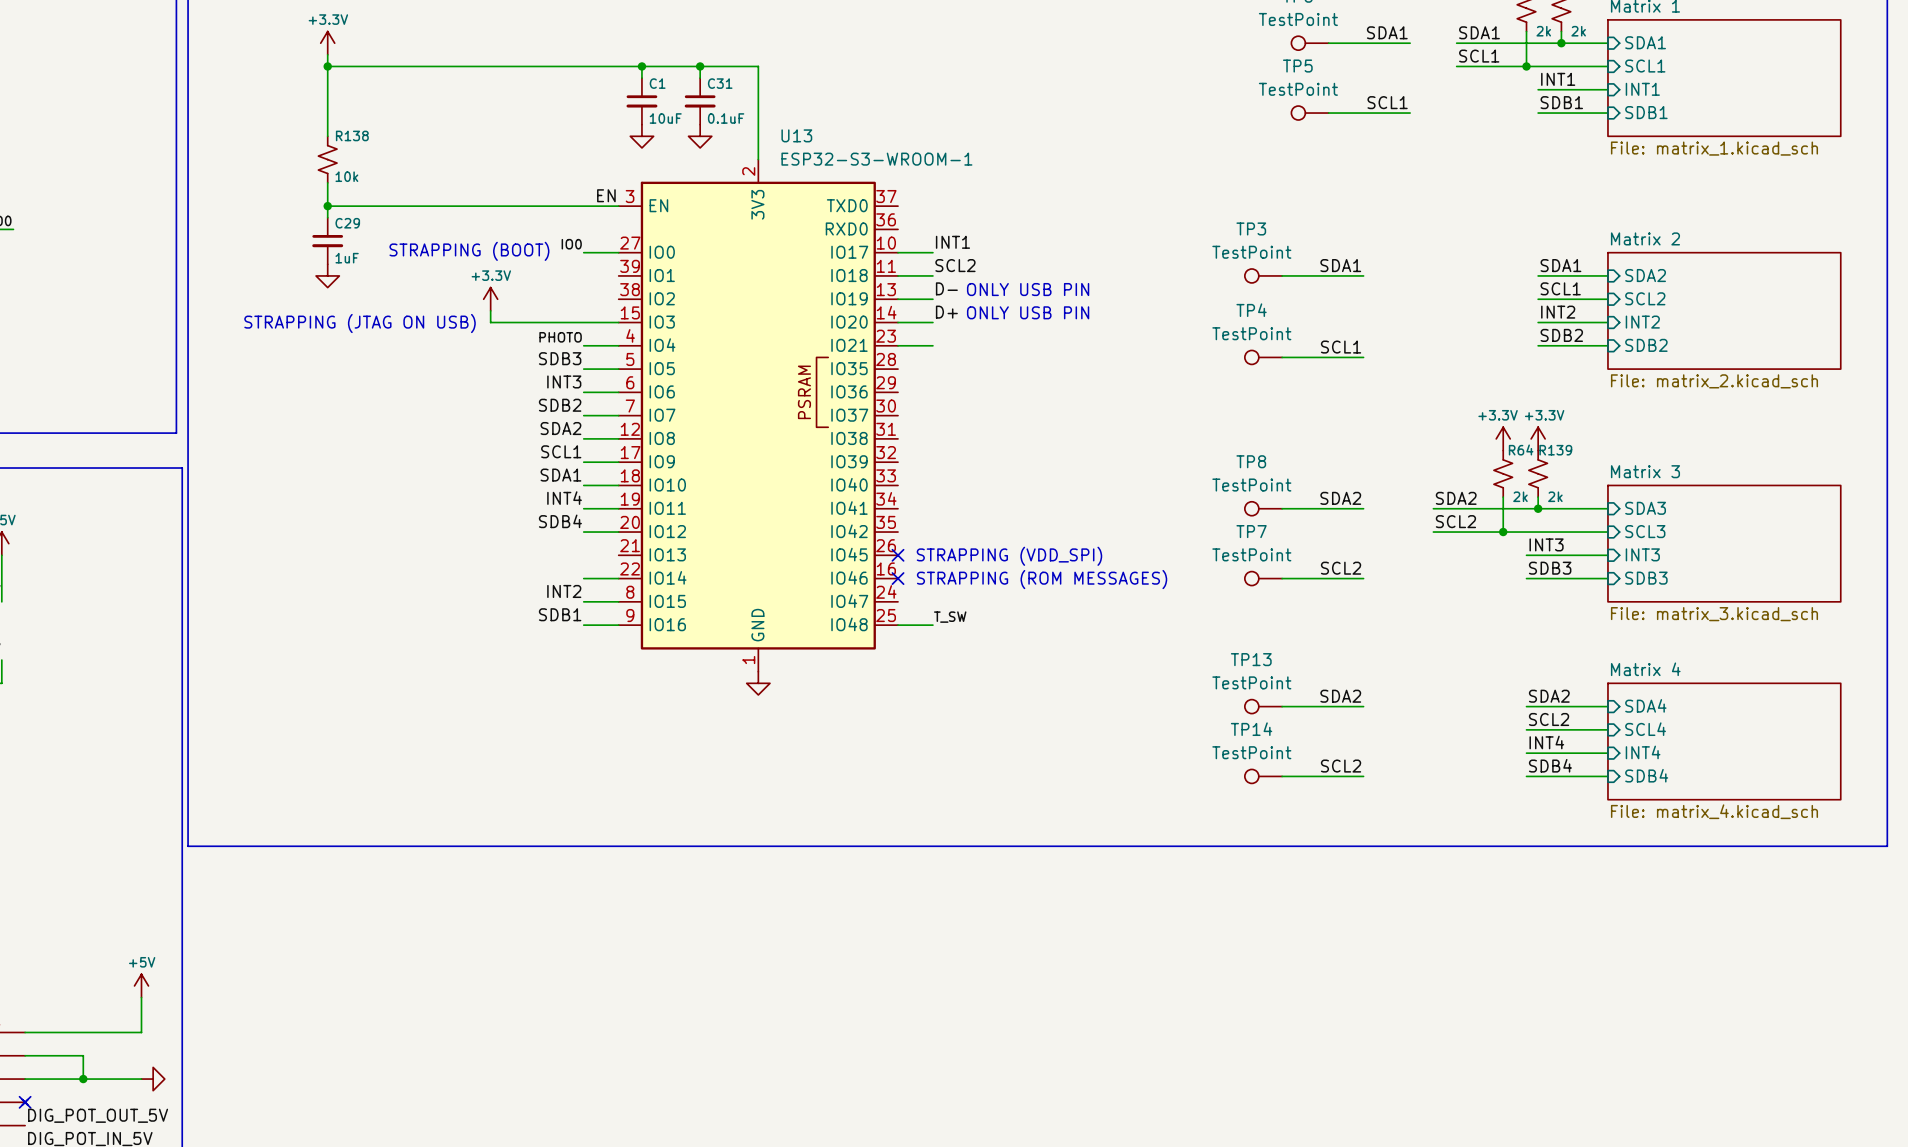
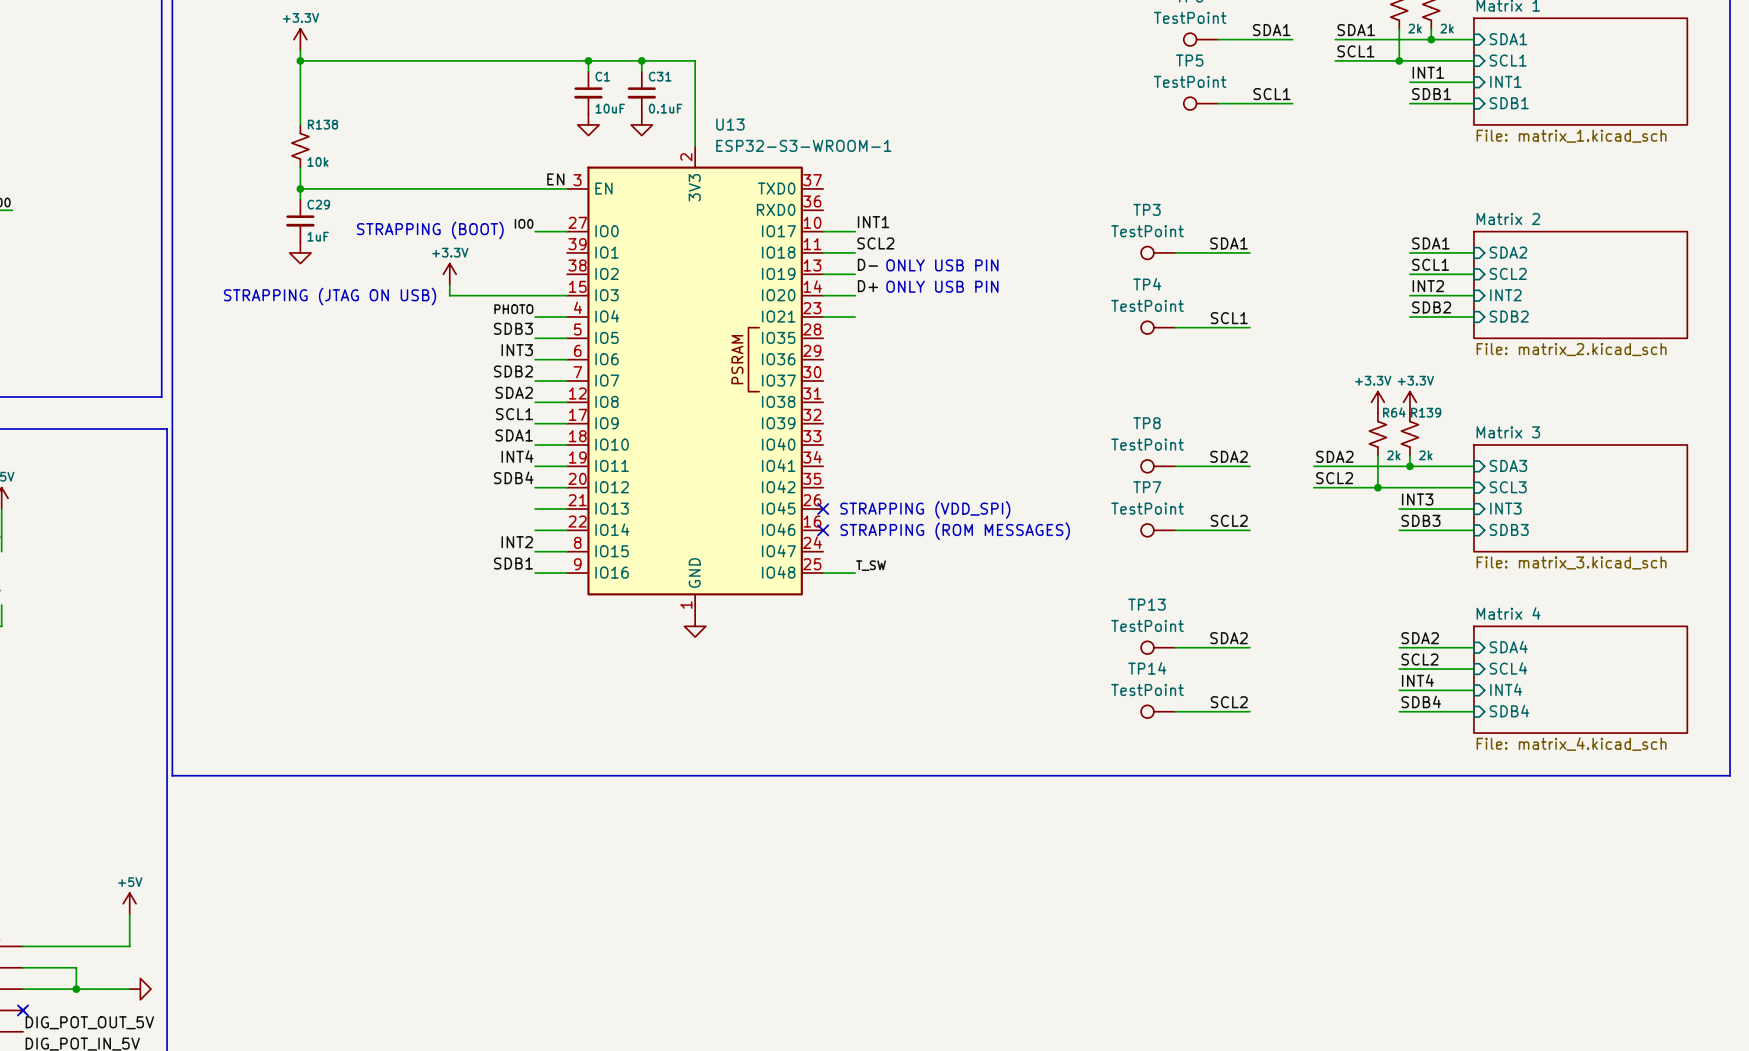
wire: none -> (535, 509) (567, 509)

